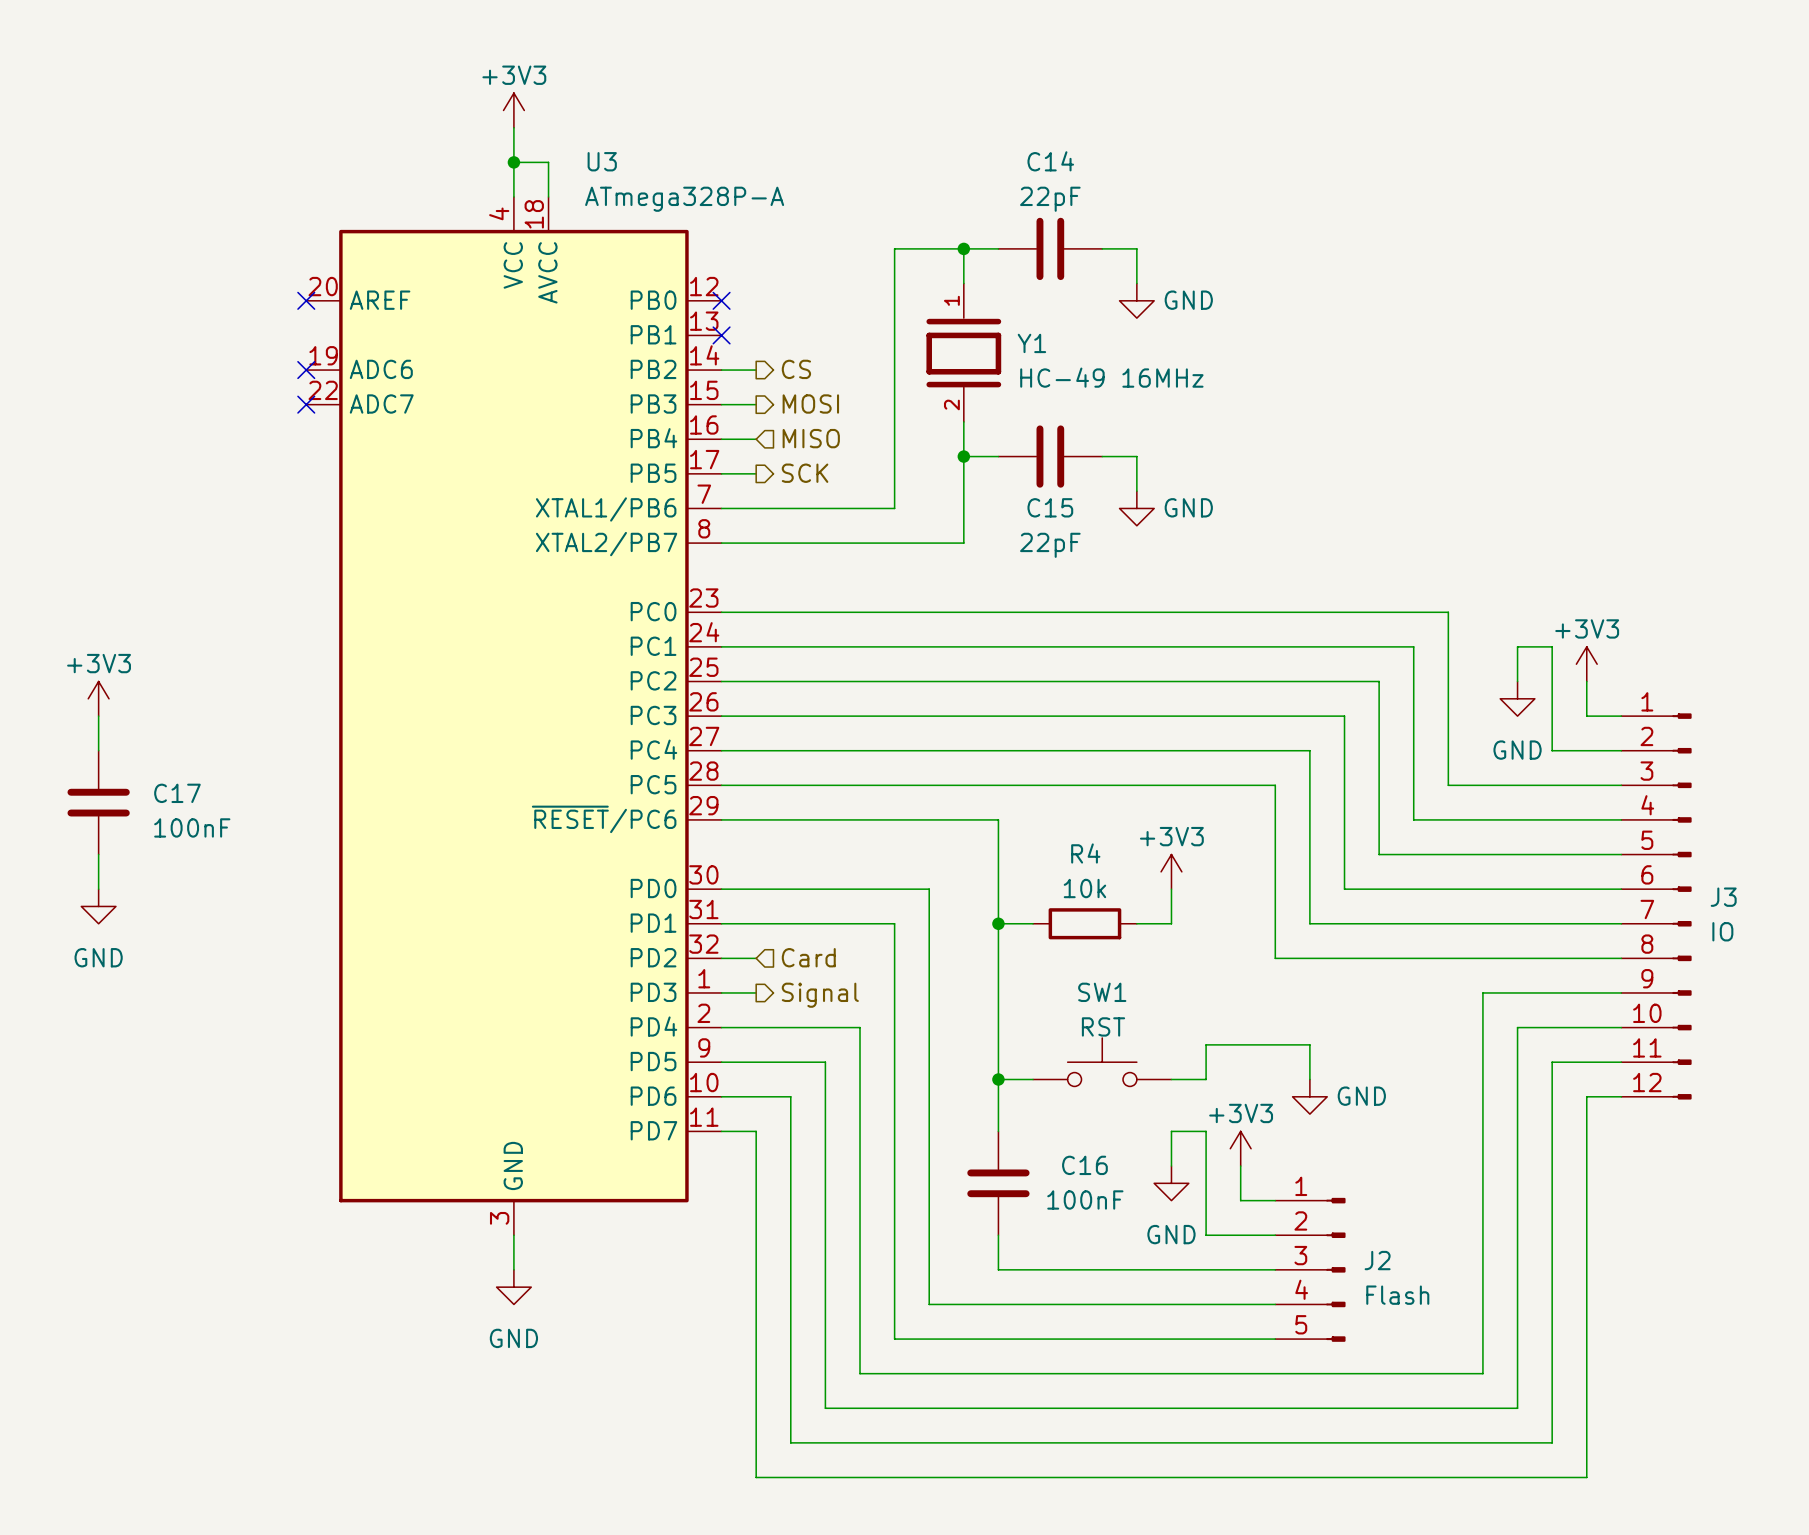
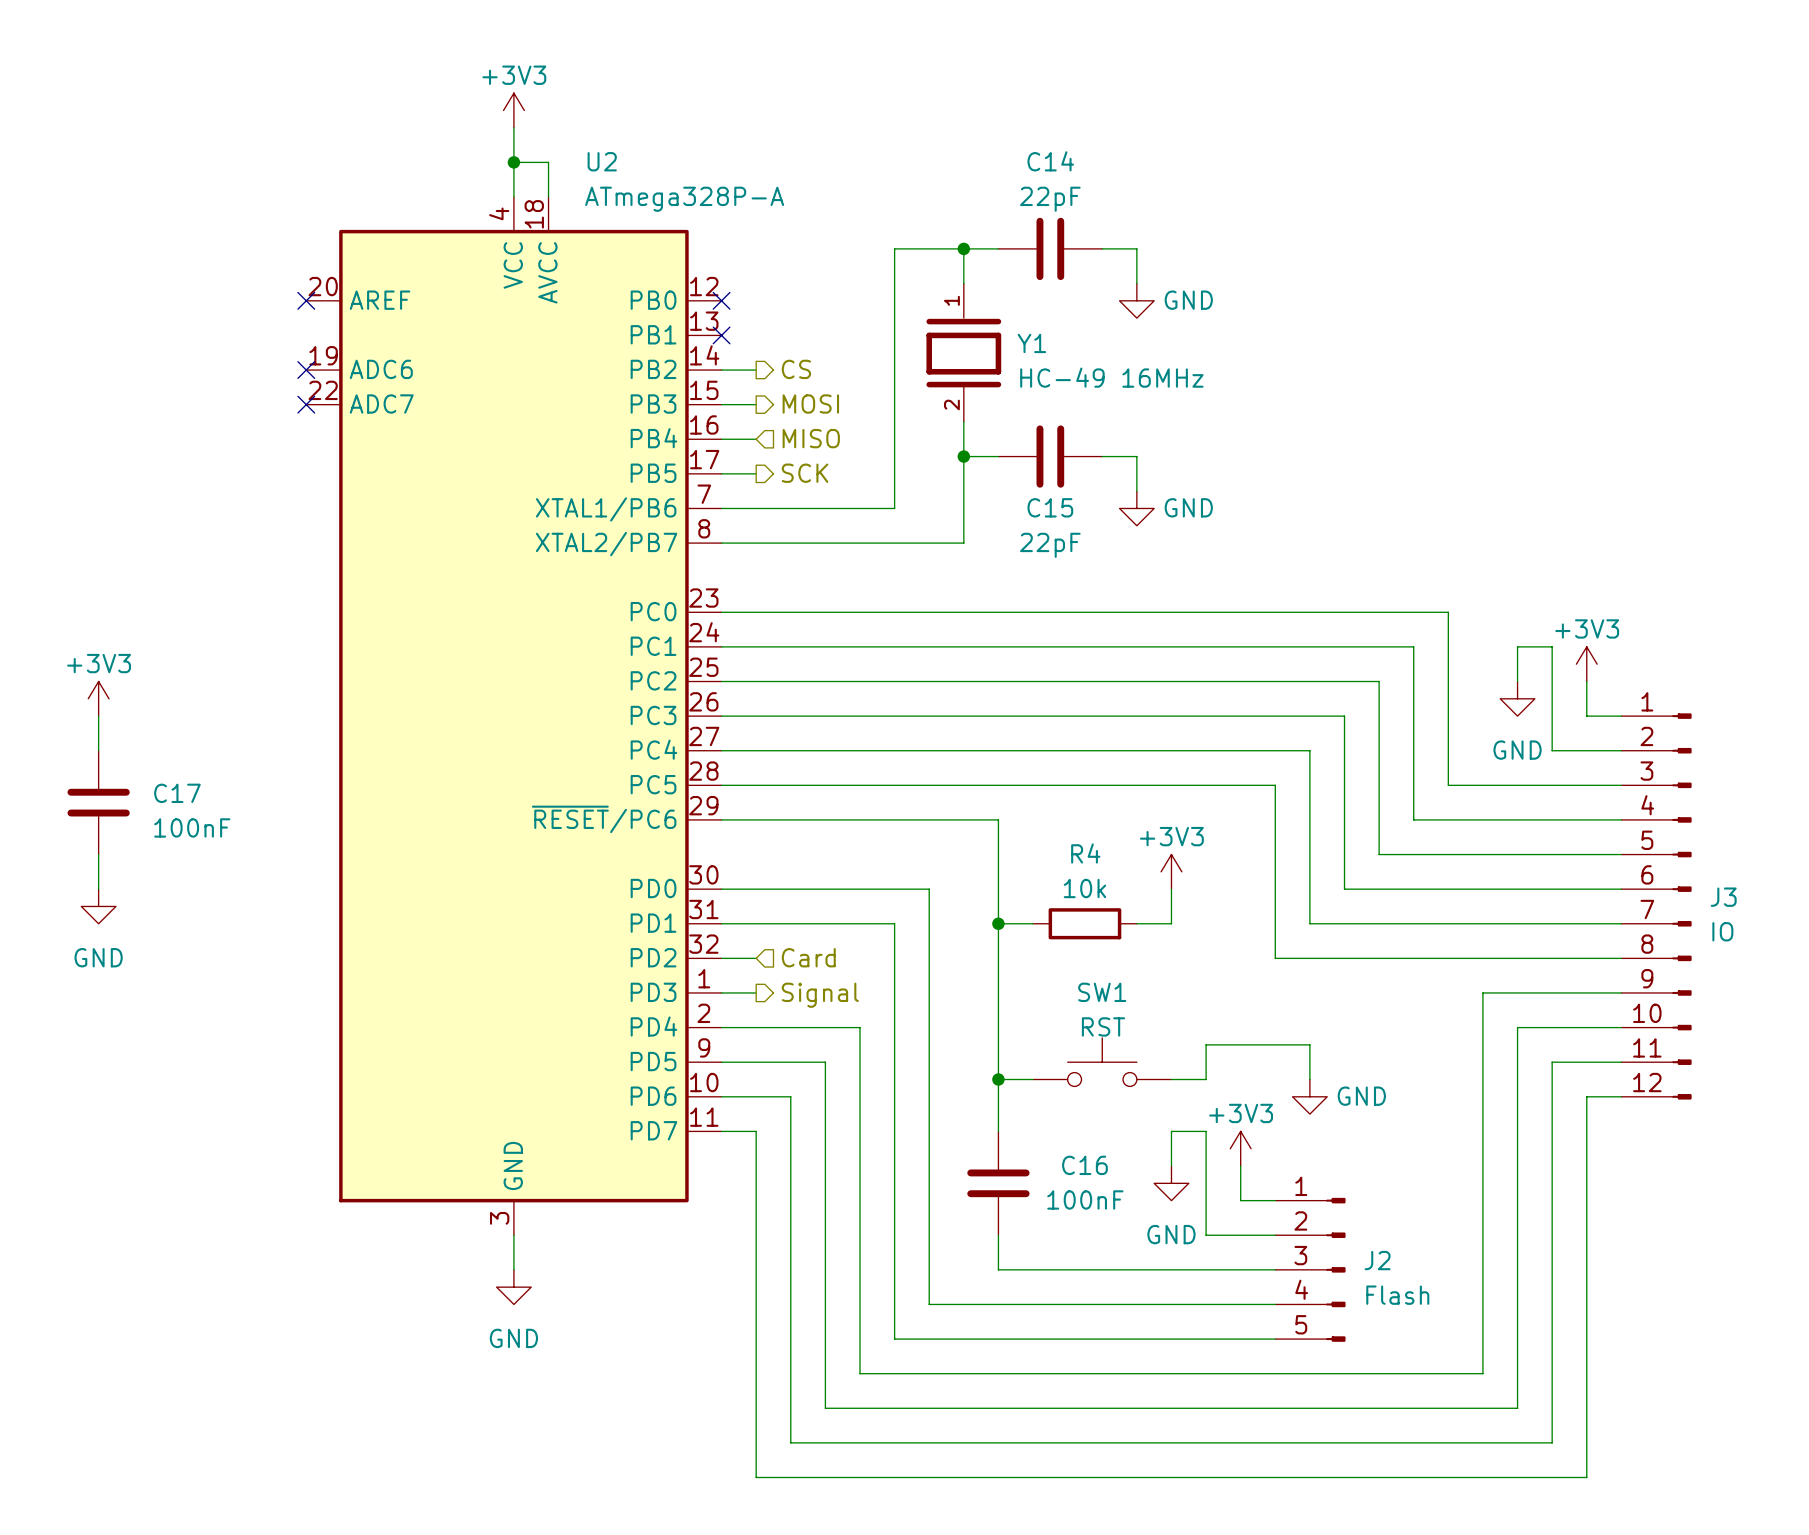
U3 name: U3 (602, 161) -> U2 (602, 161)

